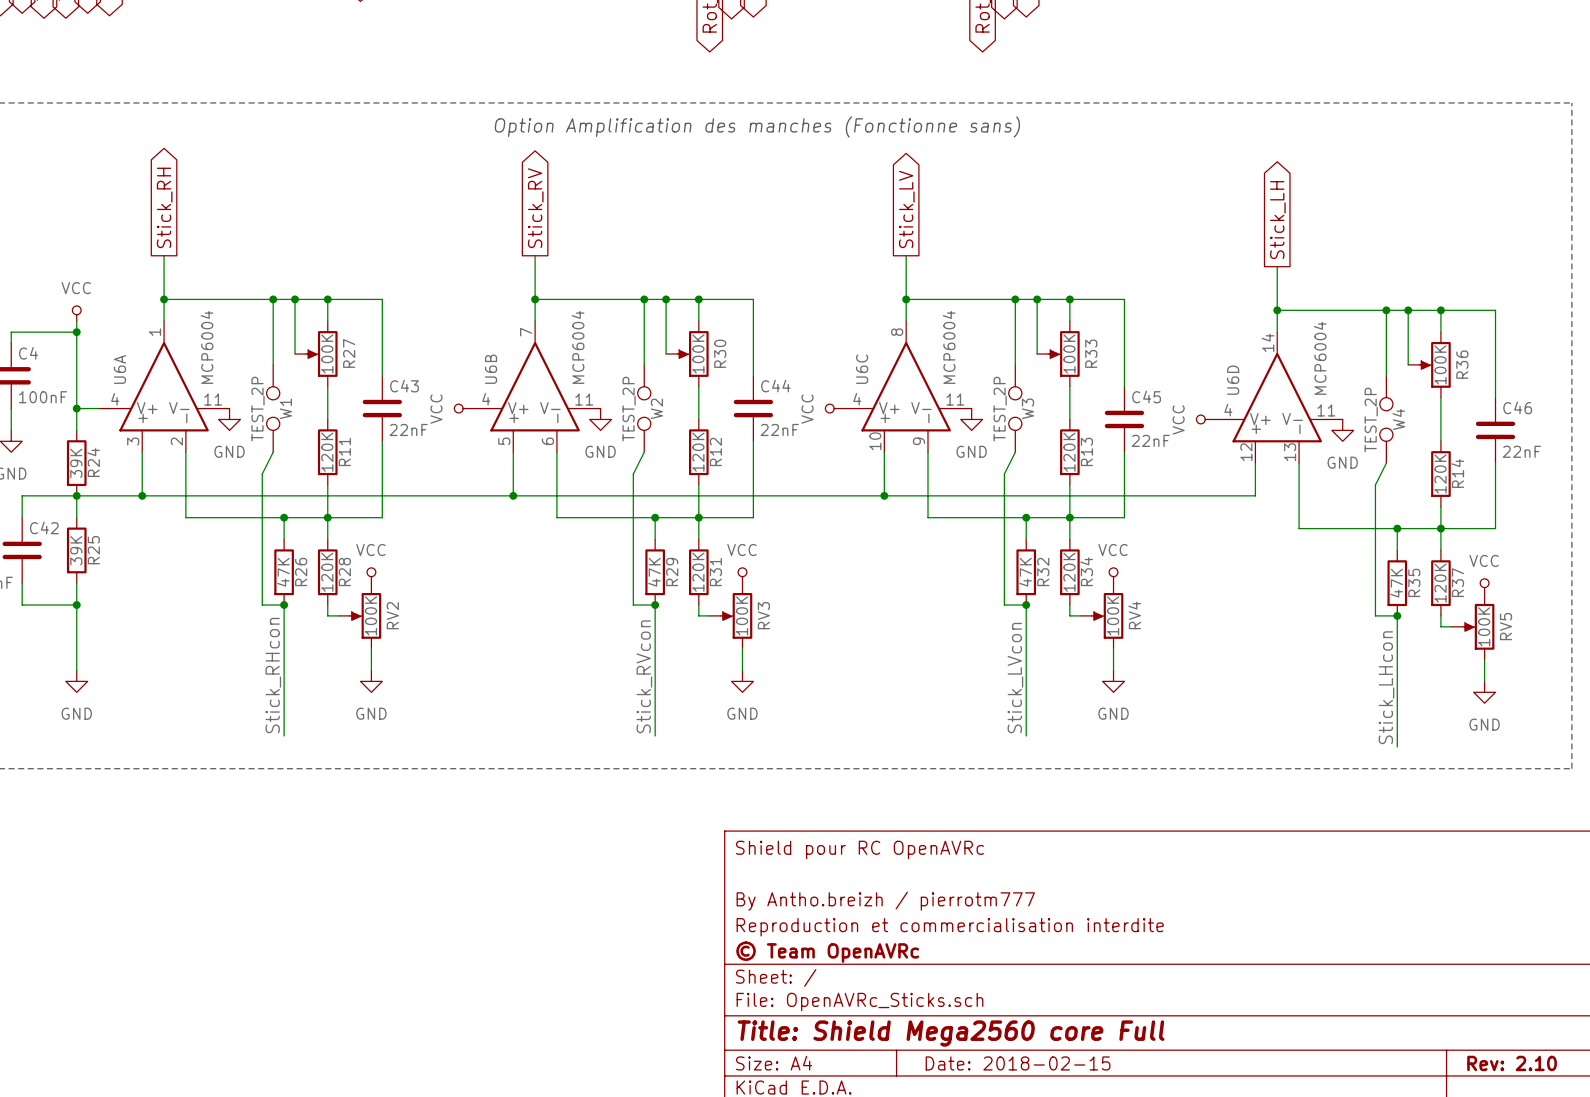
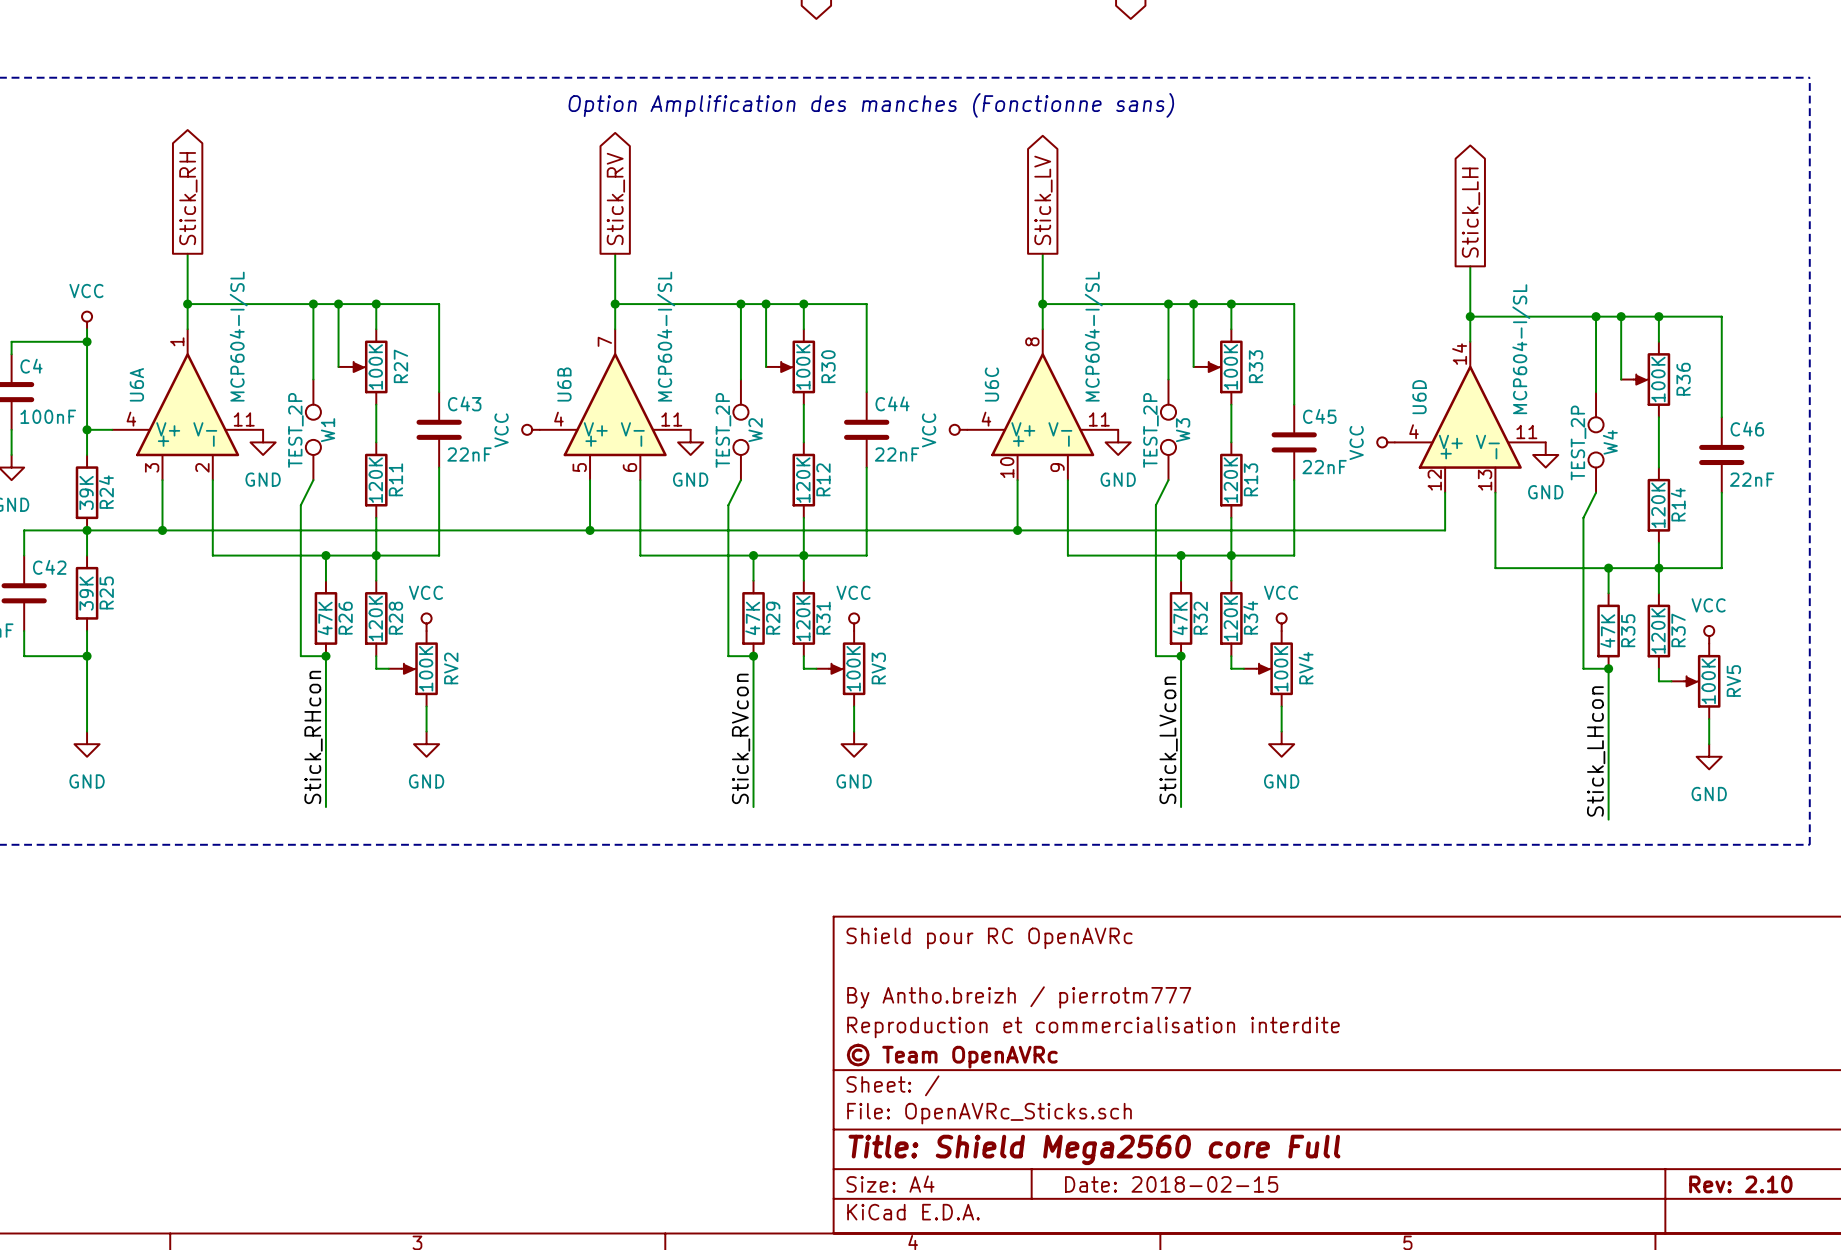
U6A value: MCP6004 (207, 347) -> MCP604-I/SL (238, 336)
U6B value: MCP6004 (578, 347) -> MCP604-I/SL (666, 336)
U6C value: MCP6004 (949, 347) -> MCP604-I/SL (1093, 336)
U6D value: MCP6004 (1320, 358) -> MCP604-I/SL (1521, 349)

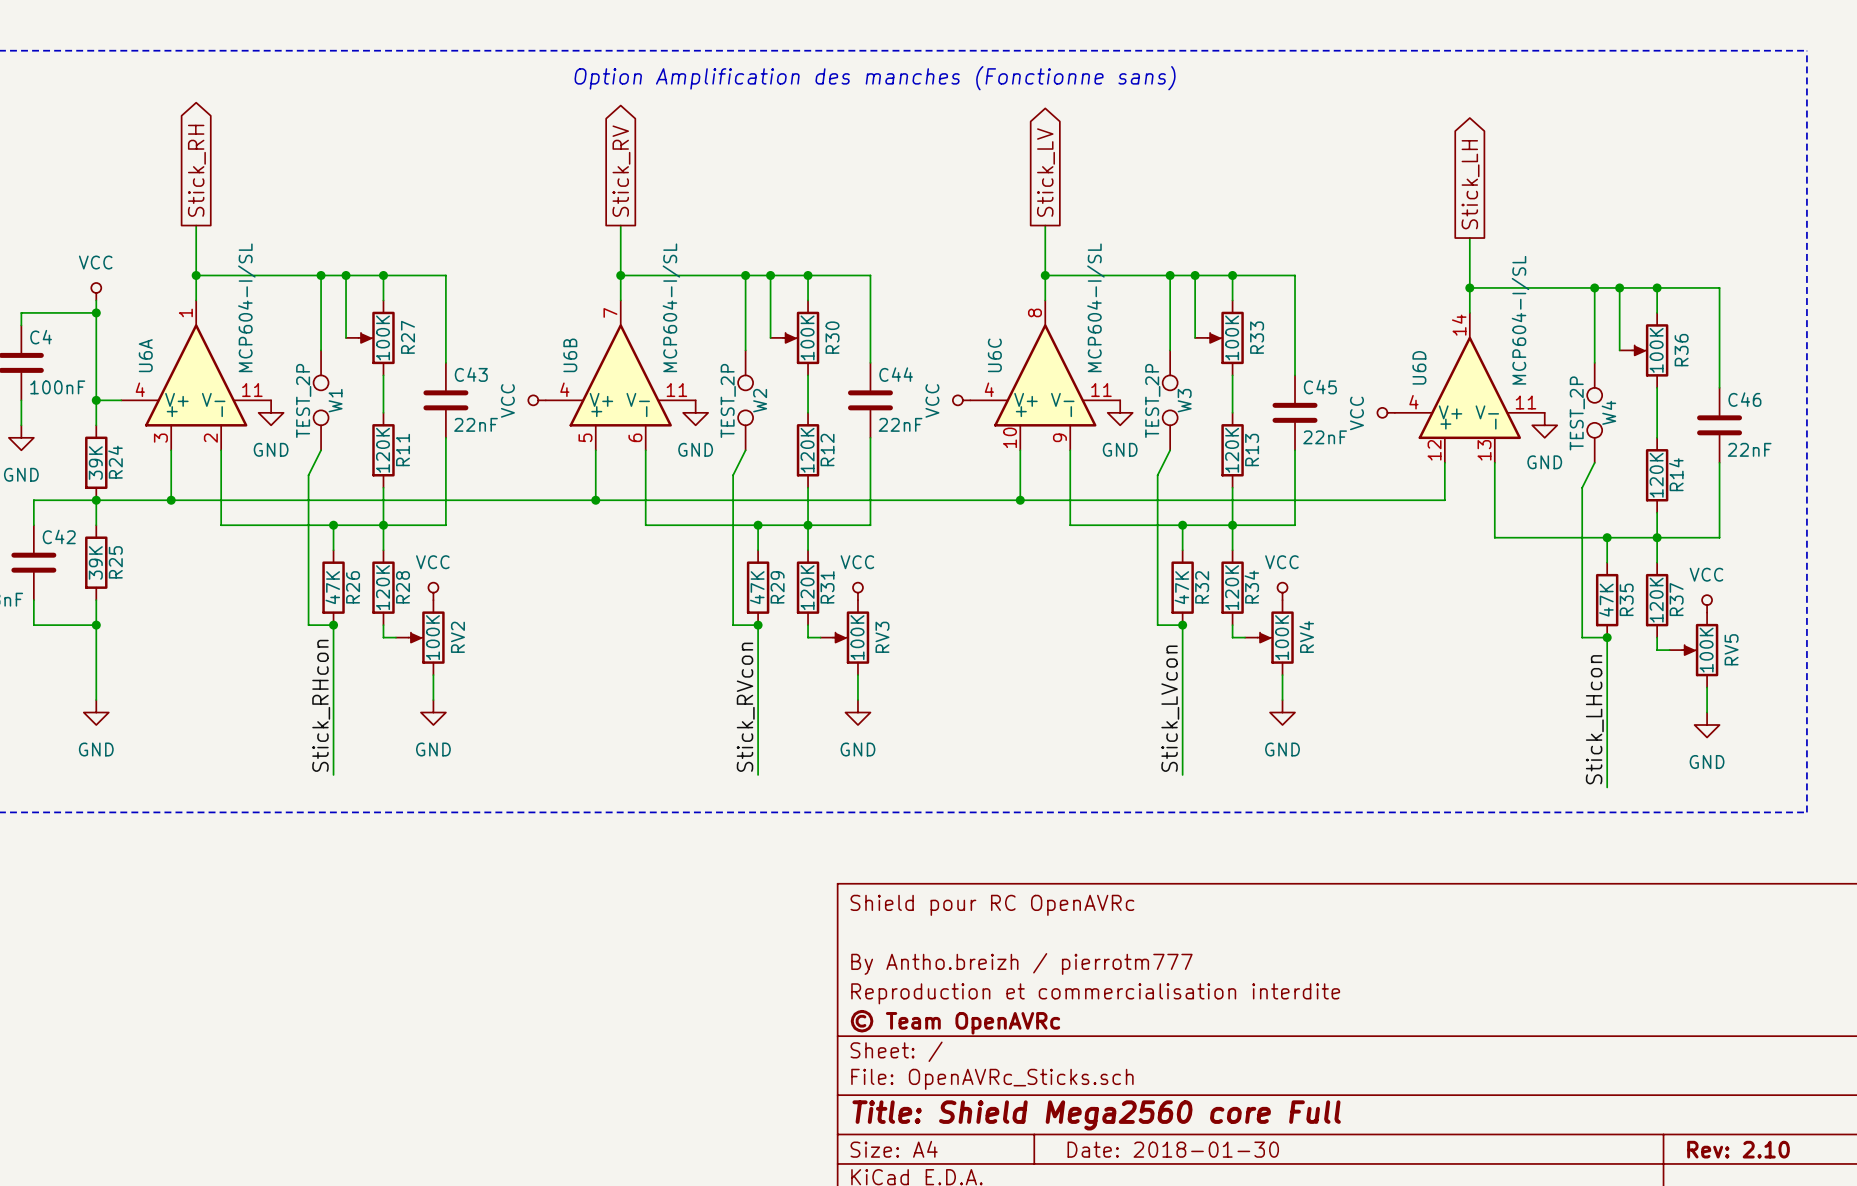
title block: Date: 2018-02-15 (1171, 1184) -> Date: 2018-01-30 (1173, 1149)

